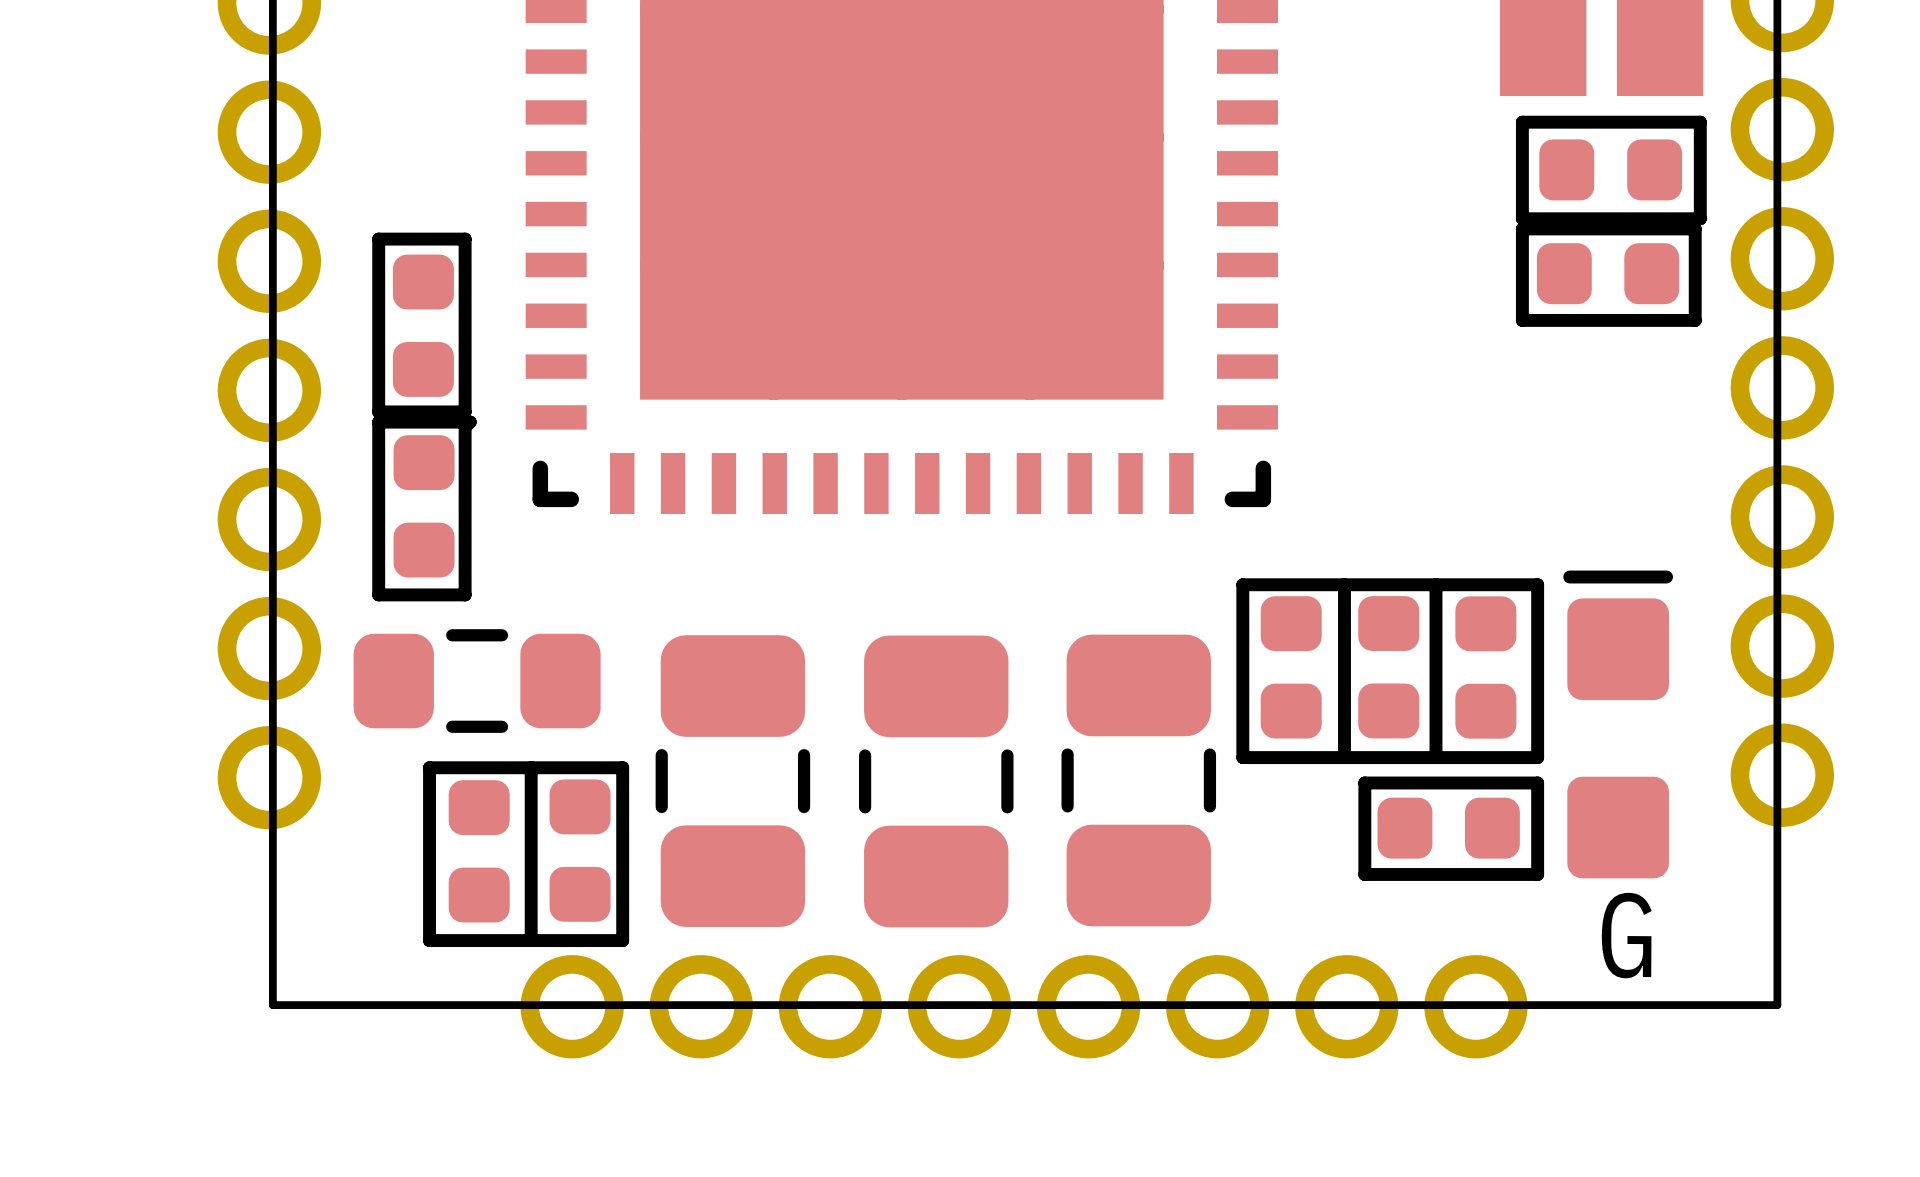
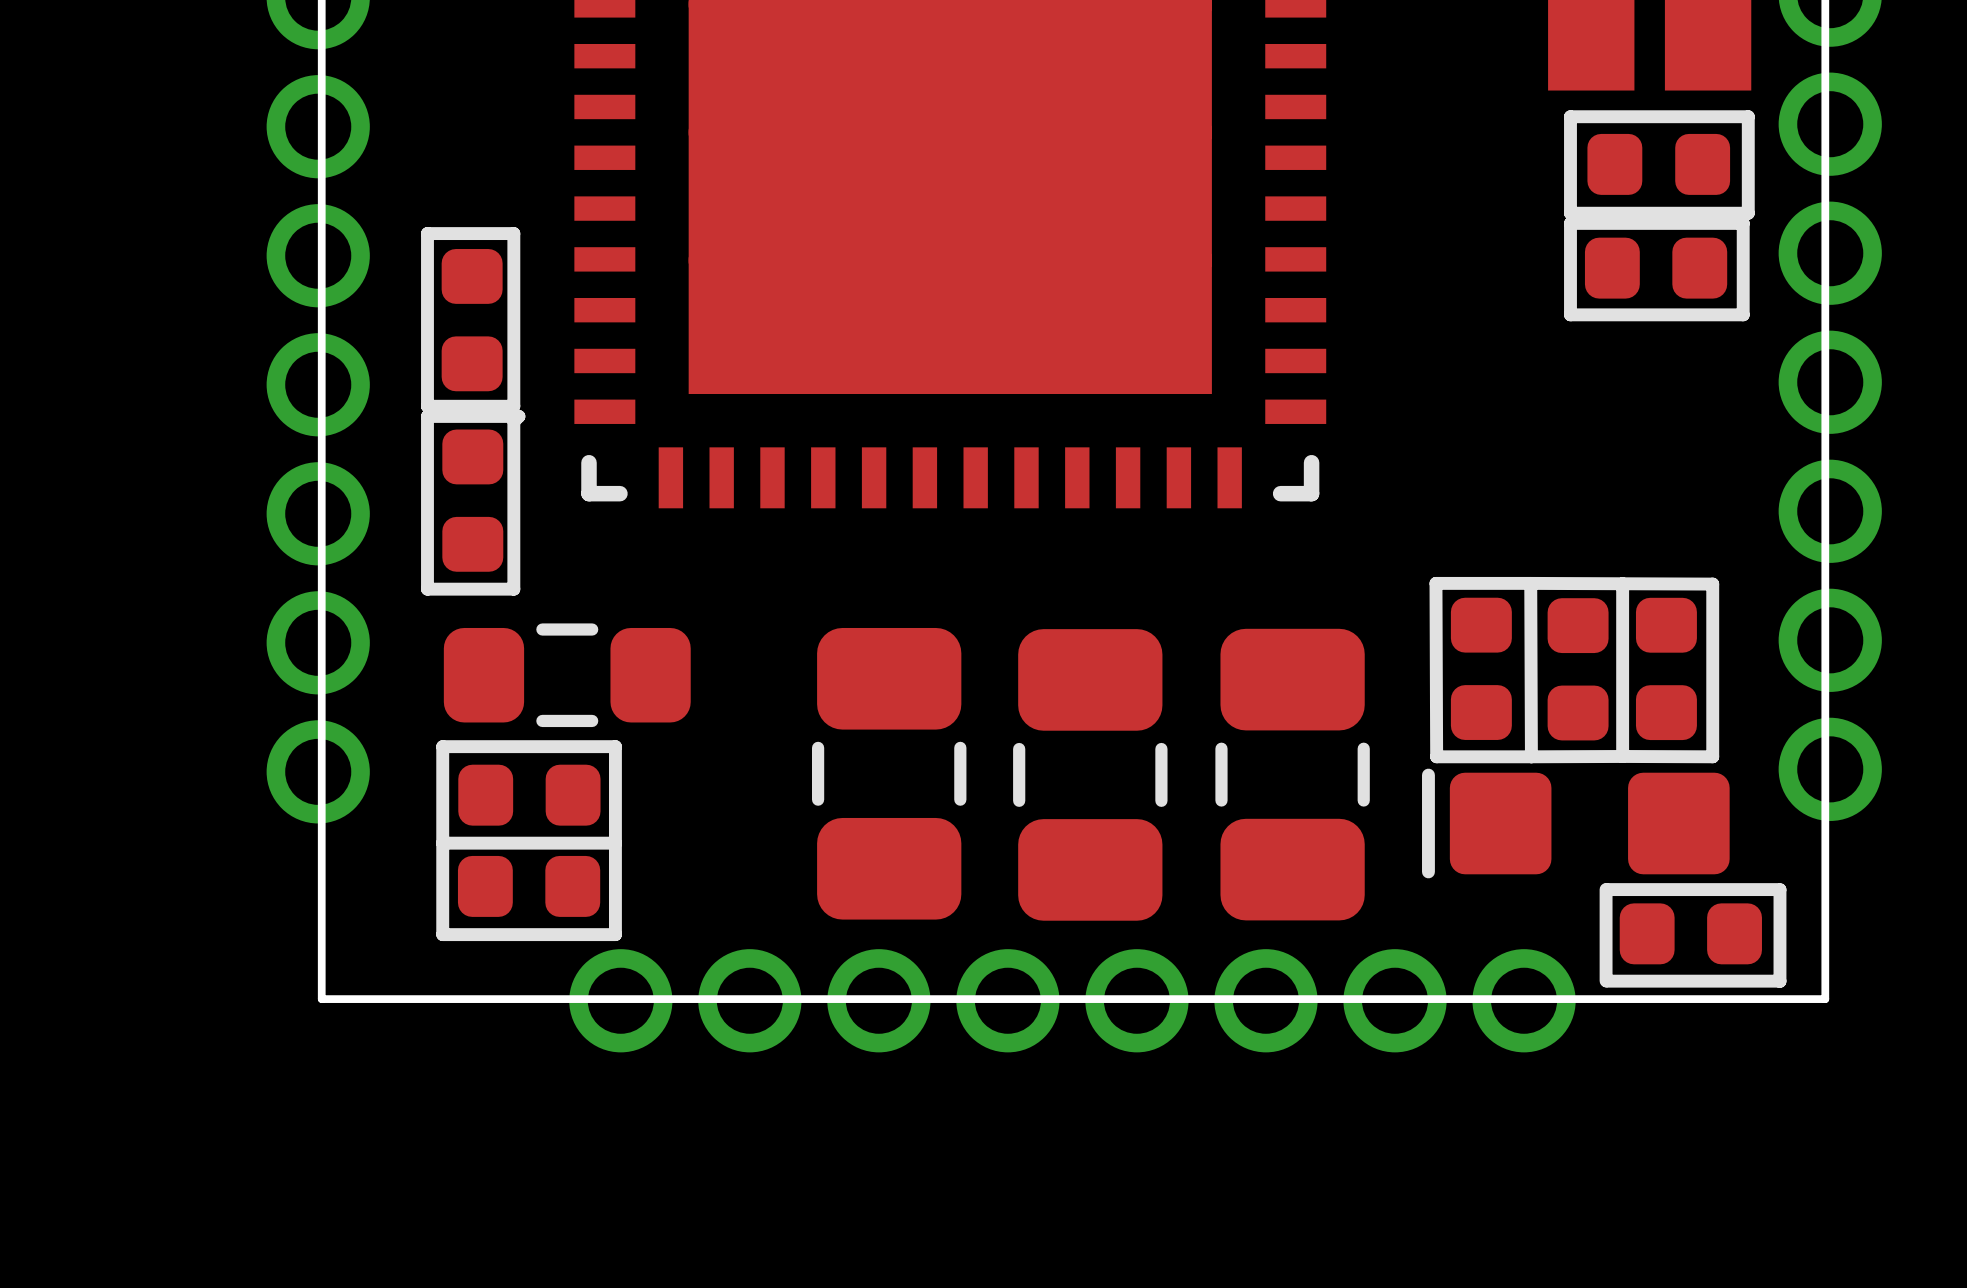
line: (1242, 584) (1537, 584) (1537, 757) (1242, 757) (1242, 584) -> none
line: (1344, 584) (1344, 757) -> (1622, 583) (1622, 756)
line: (1435, 584) (1435, 757) -> (1530, 583) (1531, 756)
line: none -> (1530, 583) (1435, 583) (1436, 756) (1531, 756)
line: none -> (1530, 583) (1712, 584) (1712, 756) (1622, 756)
part: (1291, 667) -> none
part: (1388, 667) -> none
part: (1485, 667) -> none
part: none -> (1481, 668)
part: none -> (1666, 668)
part: none -> (1578, 669)
part position: (477, 681) -> (567, 675)
part rotation: 0° (1618, 724) -> 90° counterclockwise (1575, 823)
line: none -> (1531, 756) (1622, 756)
line: (531, 767) (531, 940) -> none
part: none -> (889, 773)
part: none -> (1090, 774)
part: (1138, 780) -> none
part: none -> (1292, 774)
part: (732, 781) -> none
part: (936, 781) -> none
line: (1364, 782) (1537, 782) (1537, 874) (1364, 874) (1364, 782) -> none
part: none -> (529, 795)
part: (1448, 828) -> none
line: none -> (442, 843) (615, 843)
part: (580, 850) -> none
part: (479, 851) -> none
part: none -> (529, 886)
line: none -> (1606, 889) (1606, 980)
line: none -> (1607, 889) (1780, 889) (1779, 981) (1607, 981)
text: G (1626, 935) -> none
part: none -> (1690, 933)
line: (429, 940) (429, 767) (622, 767) (622, 940) (566, 940) -> (478, 934) (442, 934) (442, 746) (615, 746) (615, 934)

